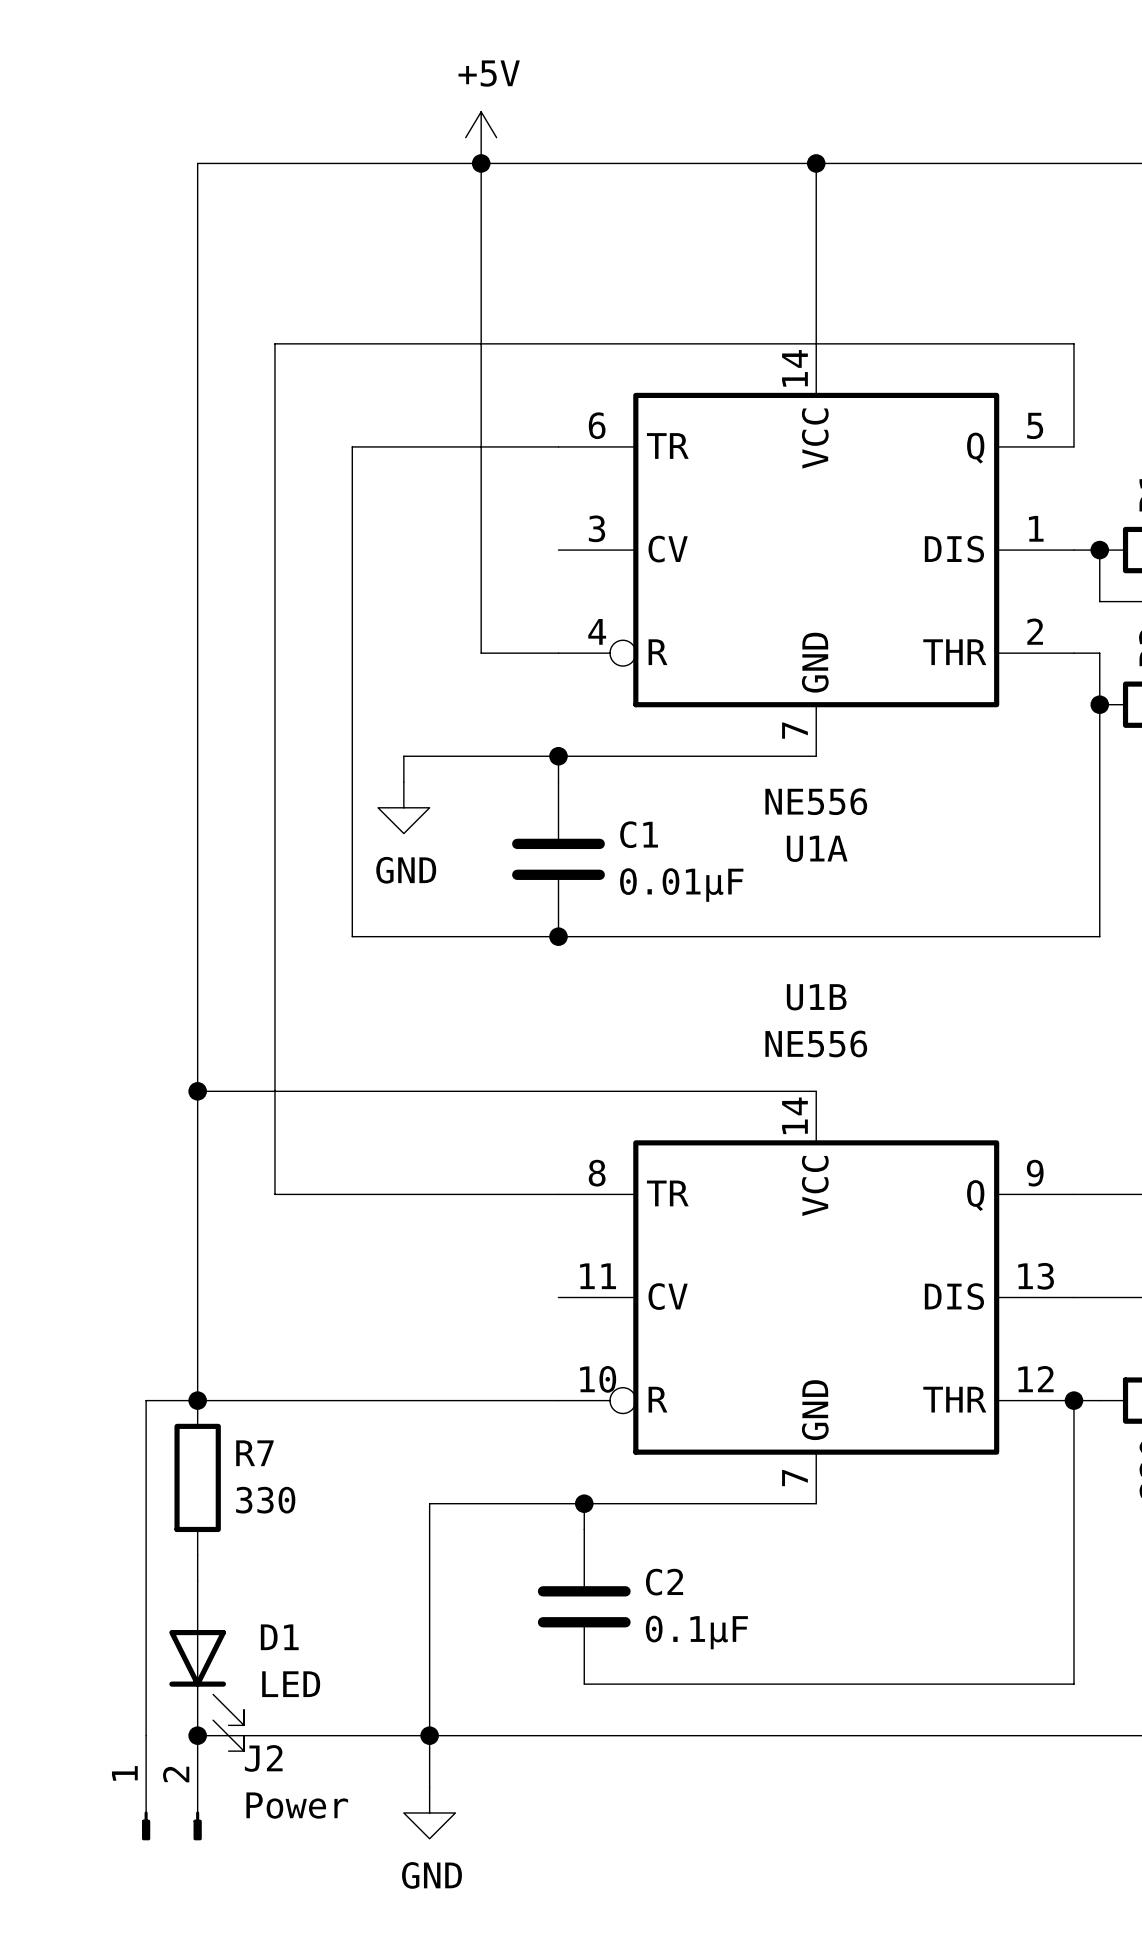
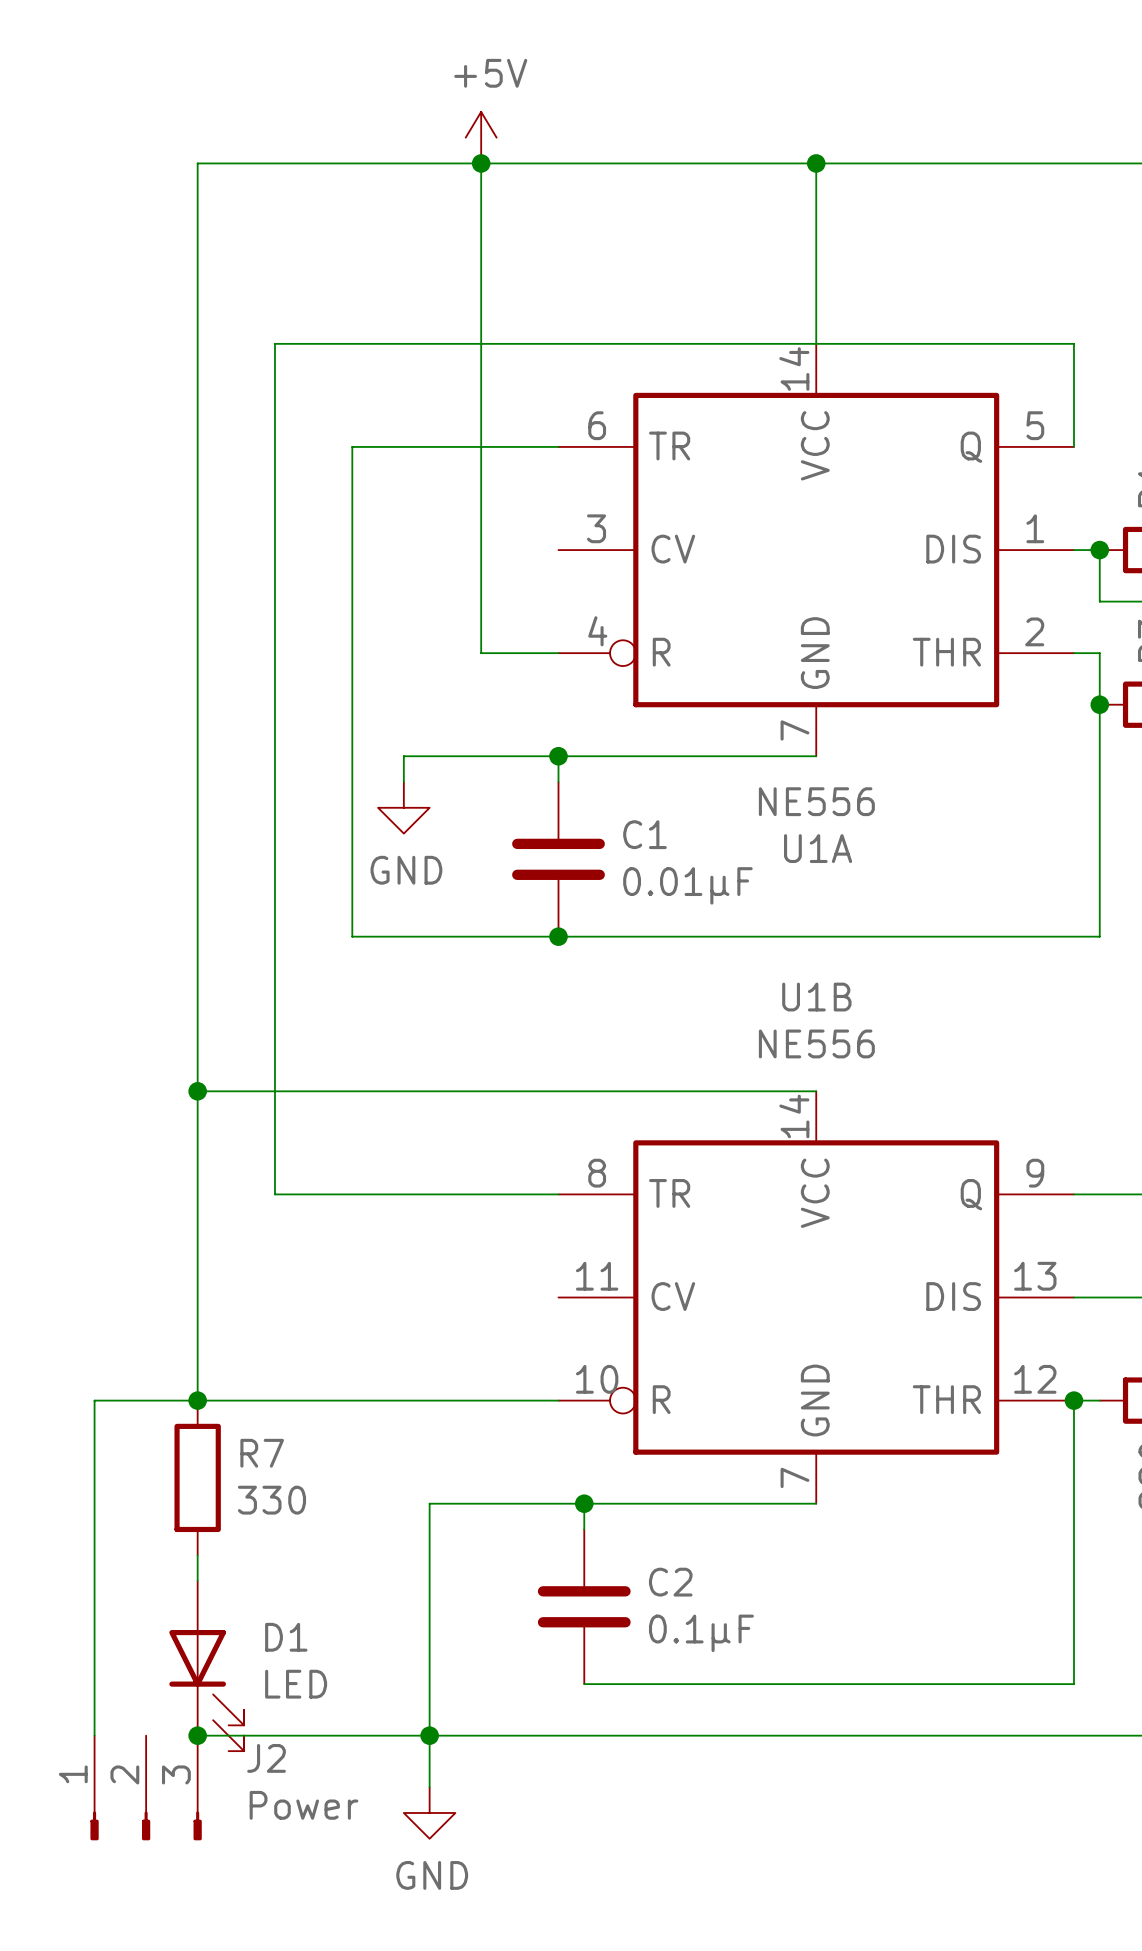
wire: (146, 1400) (146, 1735) -> (146, 1400) (94, 1400) (94, 1735)
J2 symbol: [141, 1735, 202, 1841] -> [90, 1735, 202, 1841]

